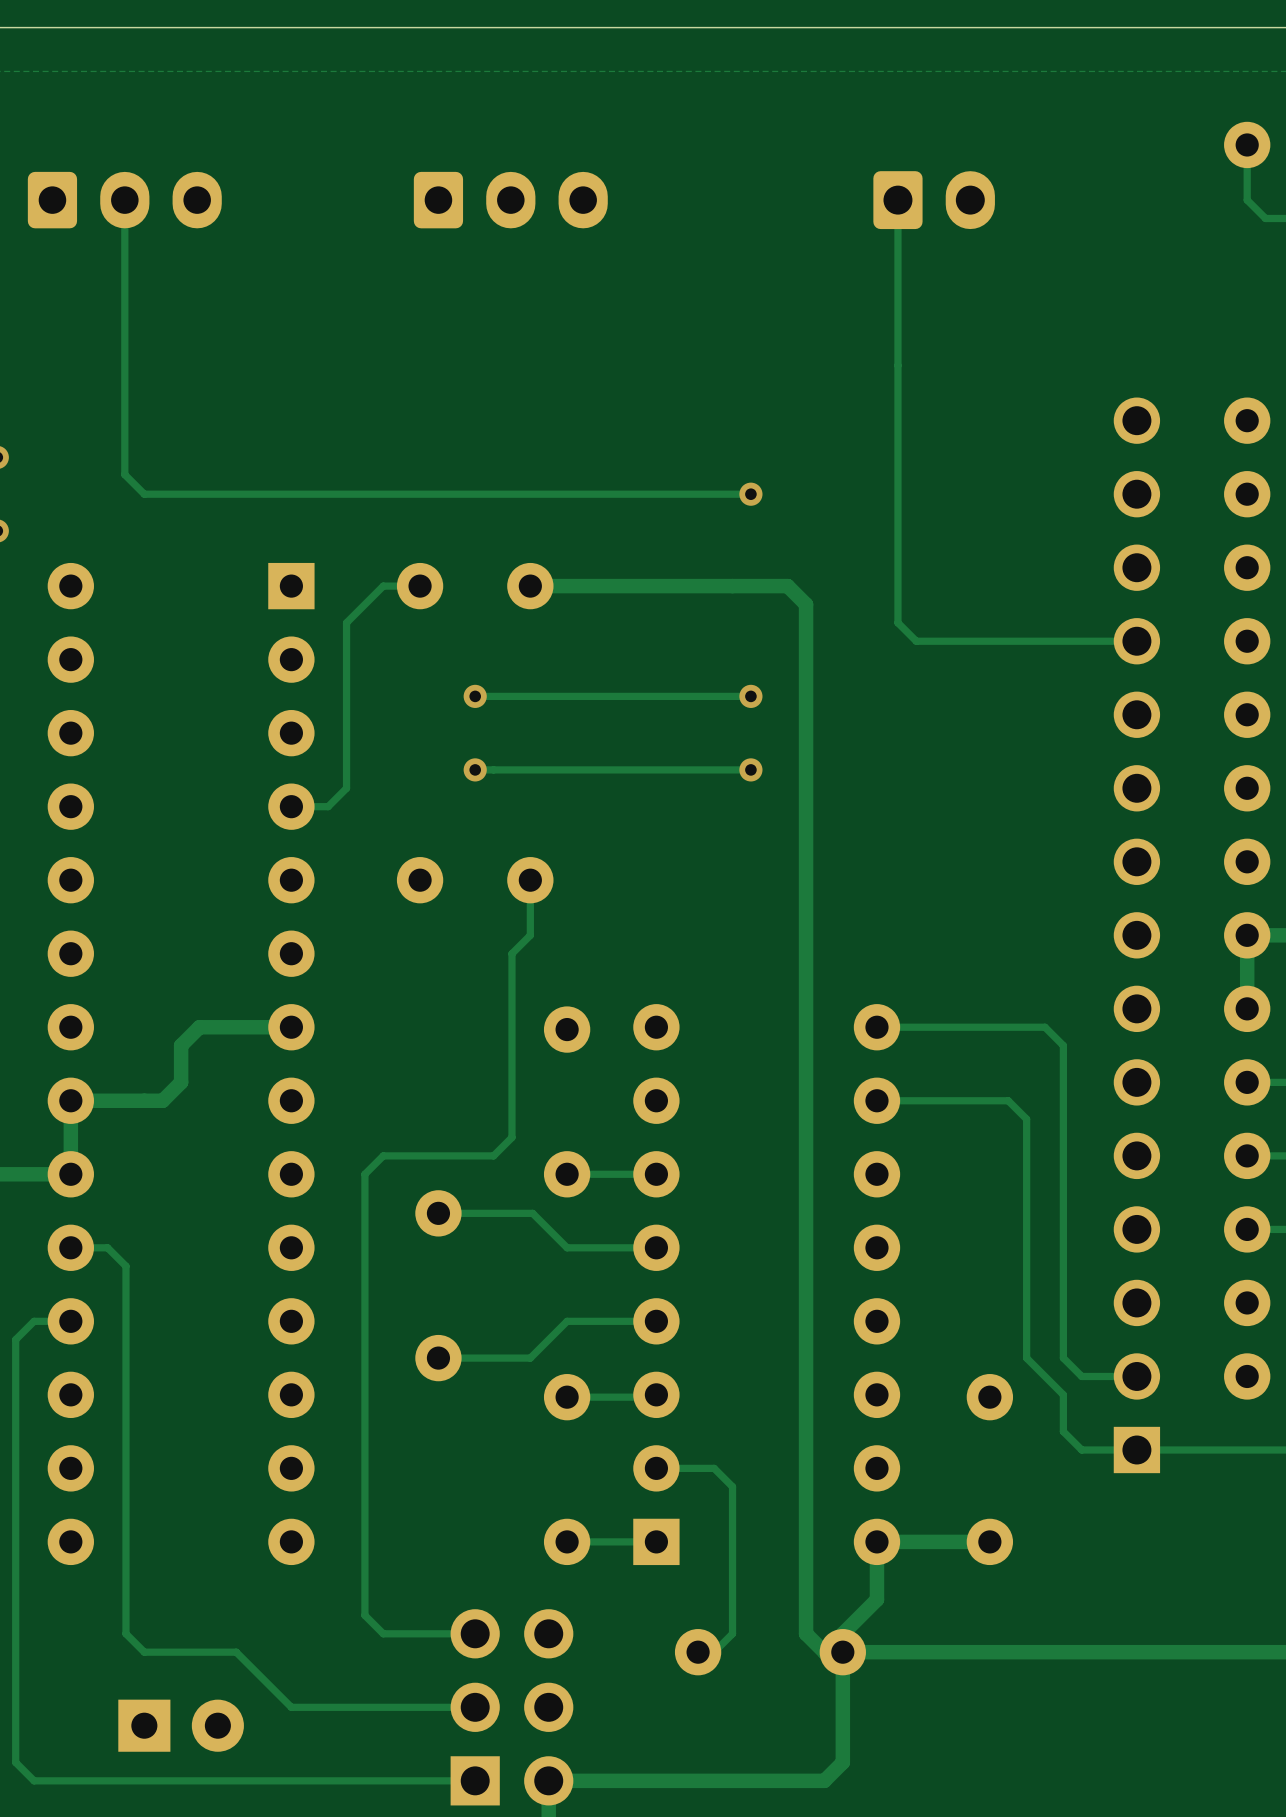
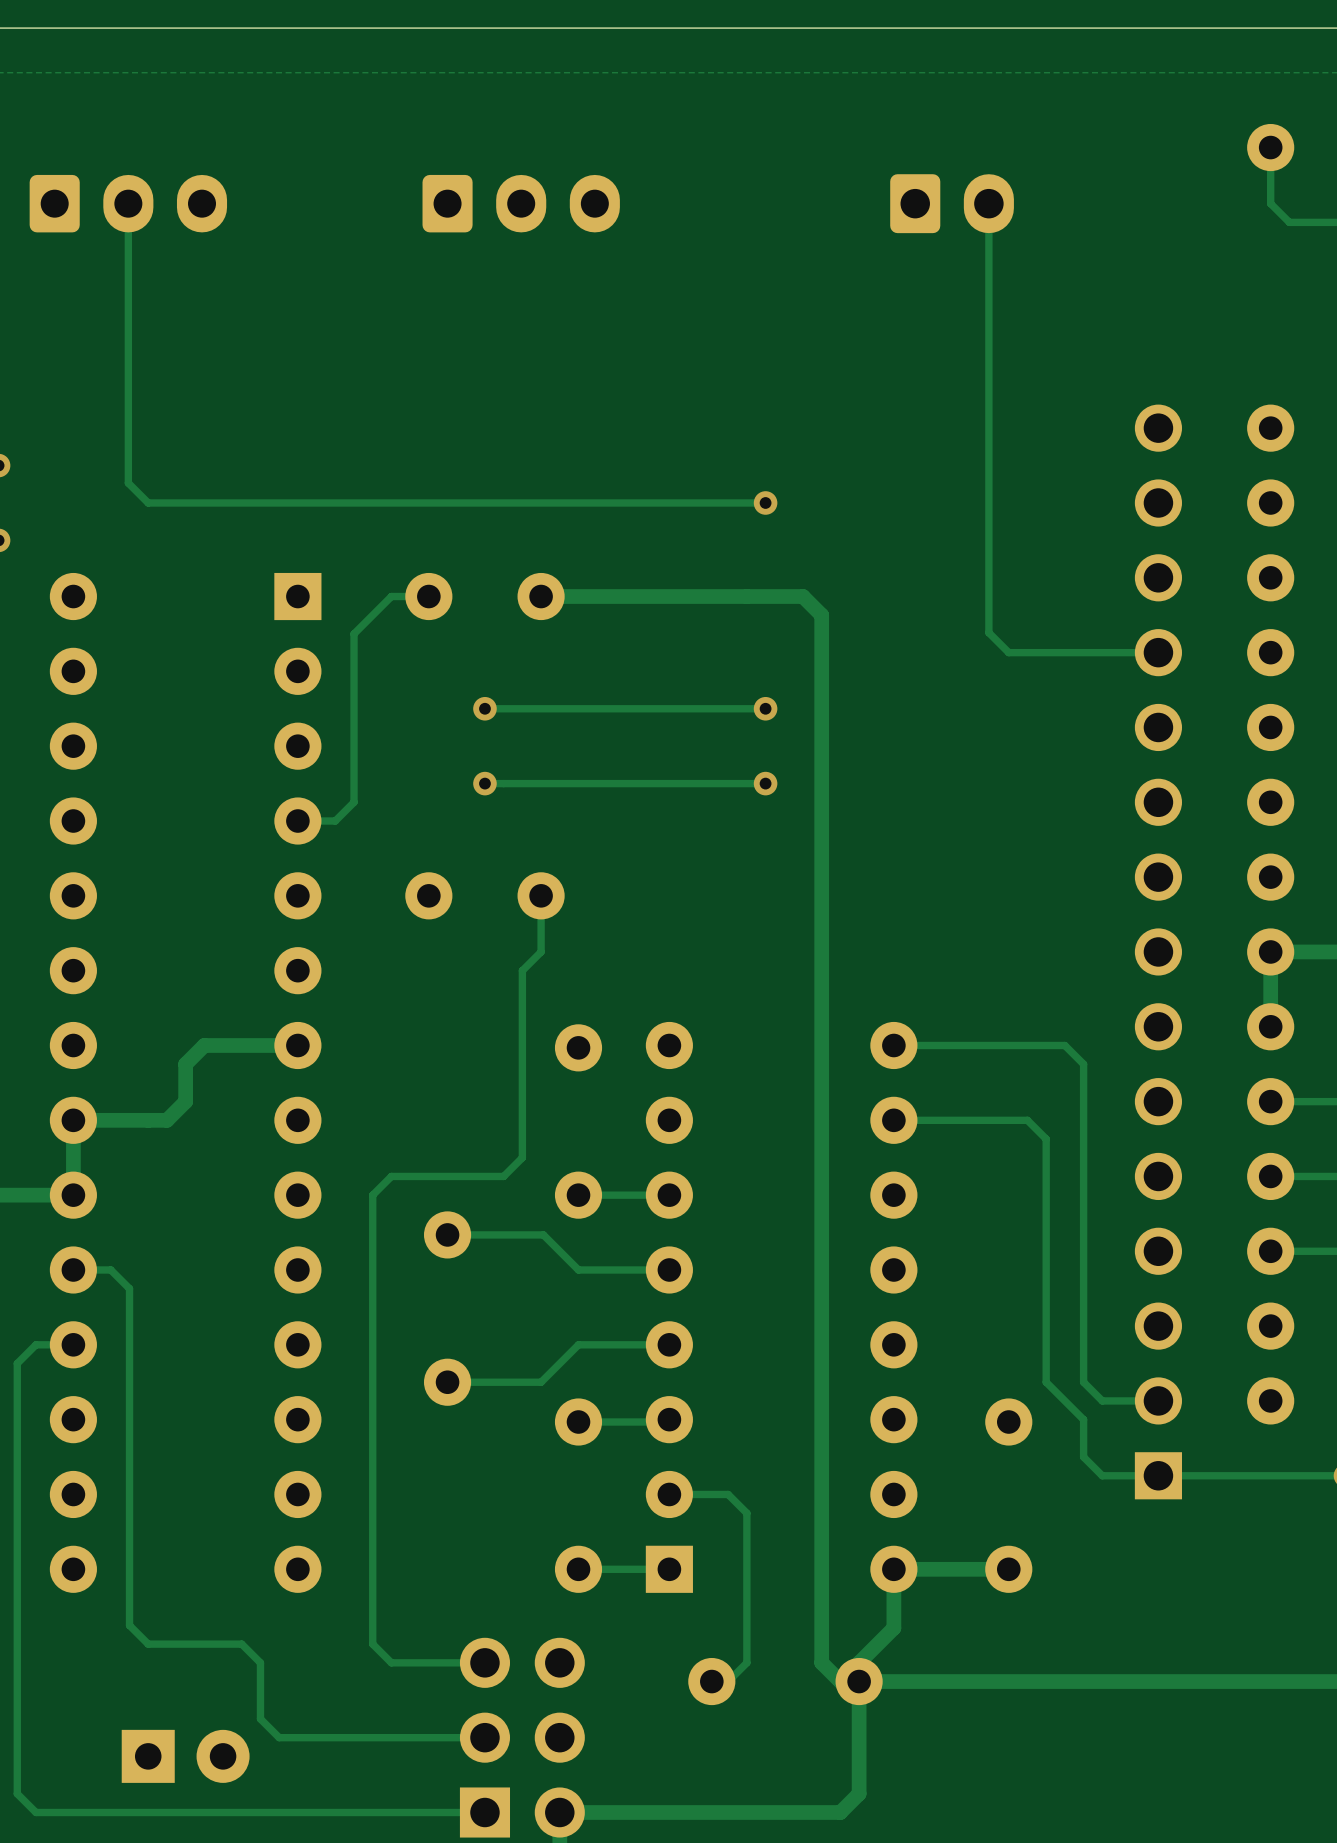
track: (897, 200) (897, 622) (916, 641) (989, 641) -> (988, 203) (988, 632) (1008, 652)
track: (125, 1597) (125, 1633) (144, 1652) (236, 1652) (291, 1707) -> (129, 1625) (148, 1644) (241, 1644) (260, 1662) (260, 1718) (279, 1737) (297, 1737)

